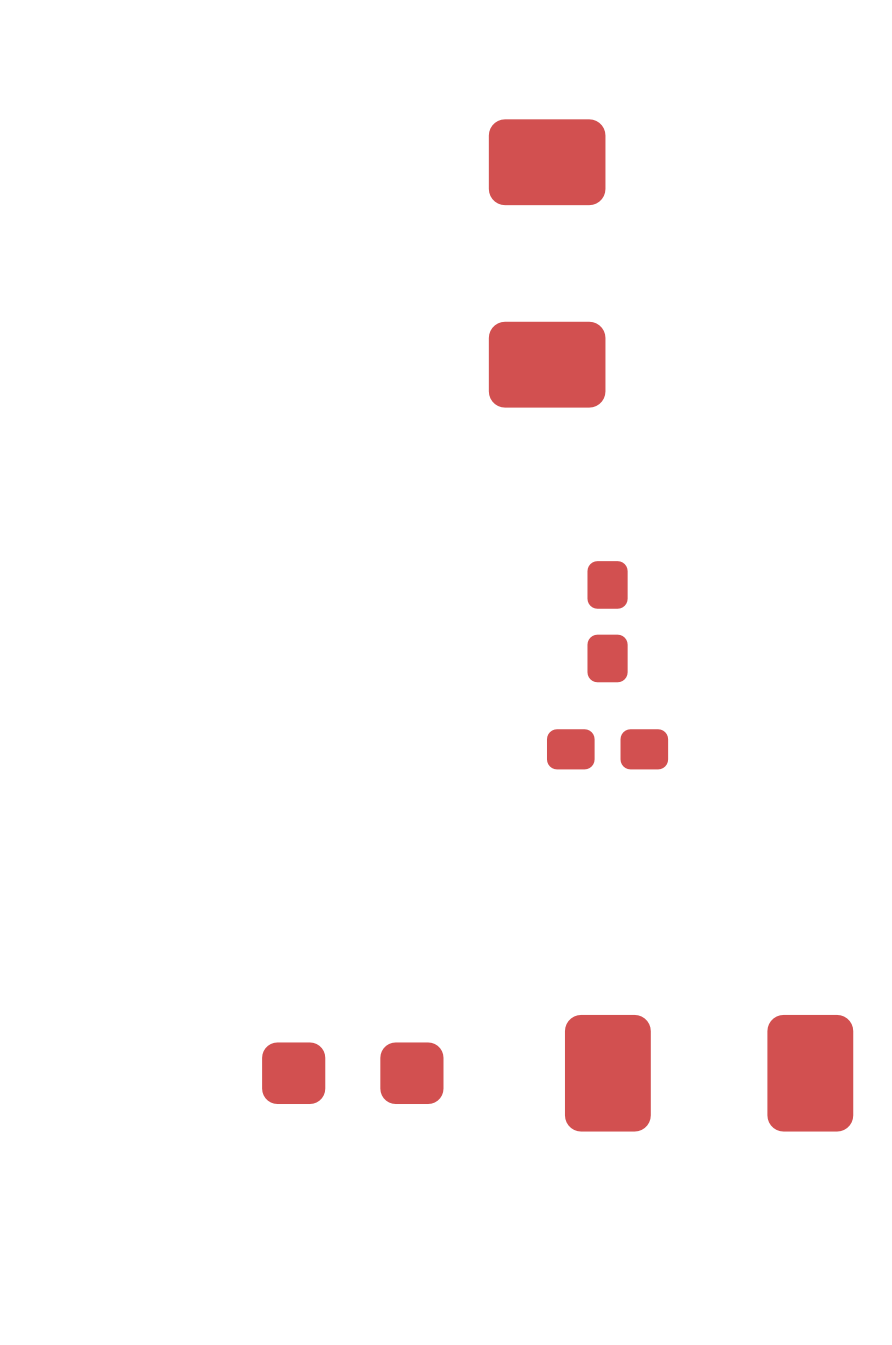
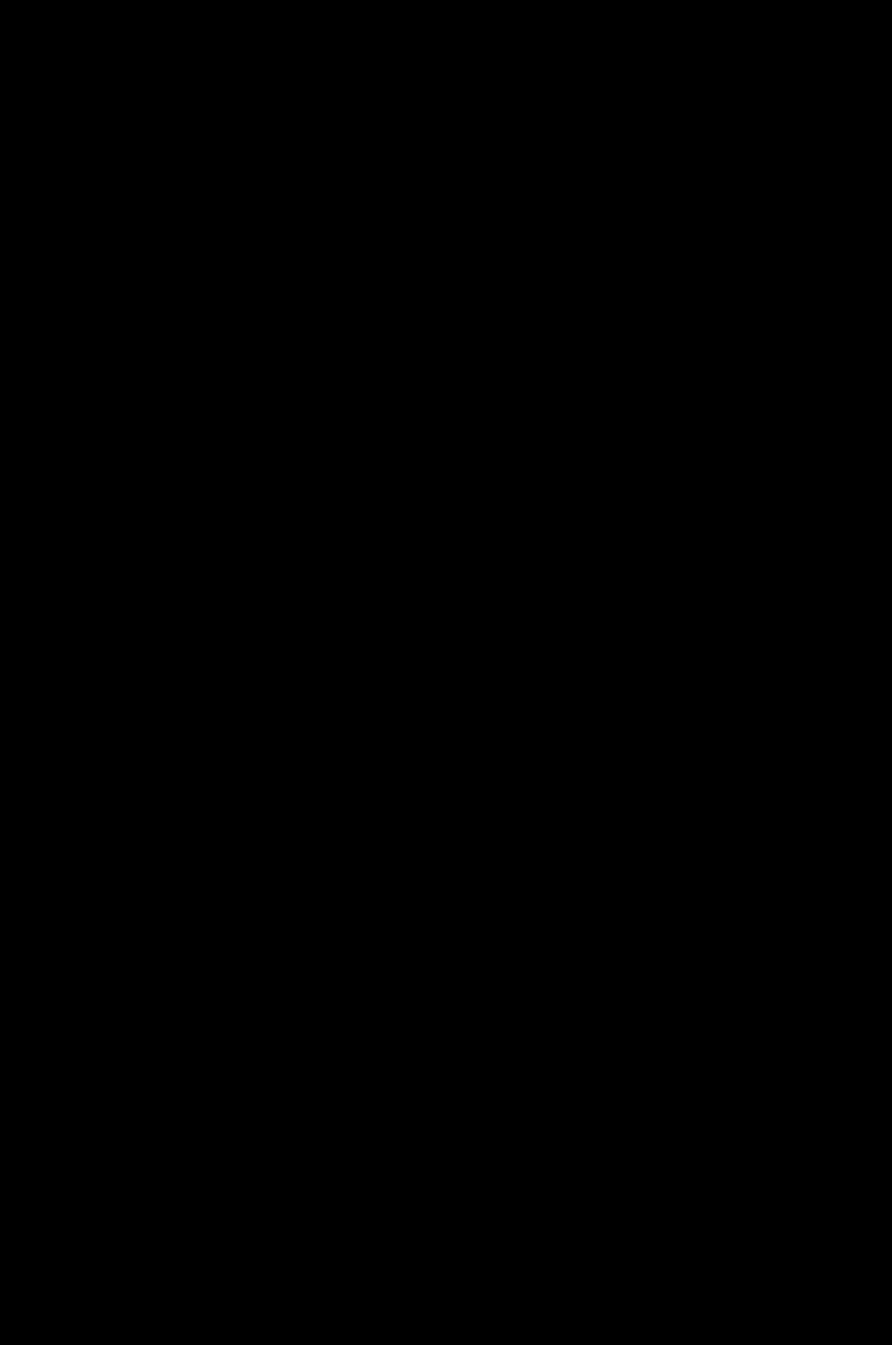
part: (547, 263) -> none
part: (607, 621) -> none
part: (607, 749) -> none
part: (352, 1073) -> none
part: (709, 1073) -> none

